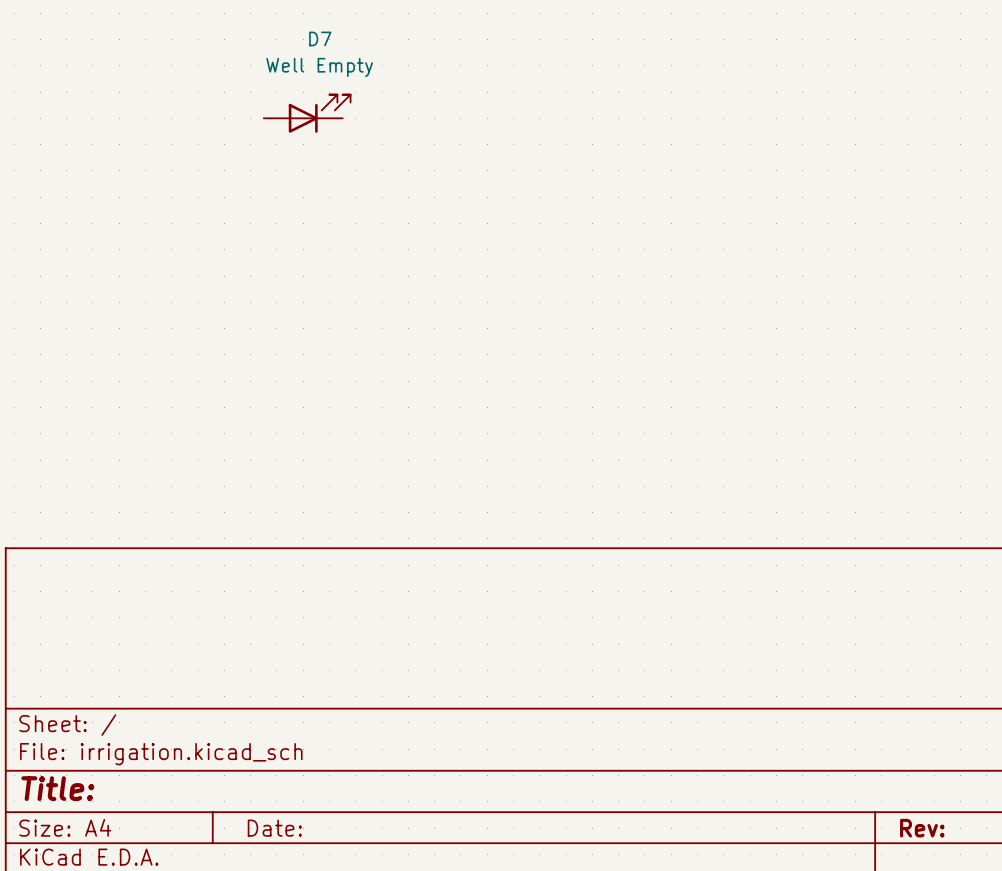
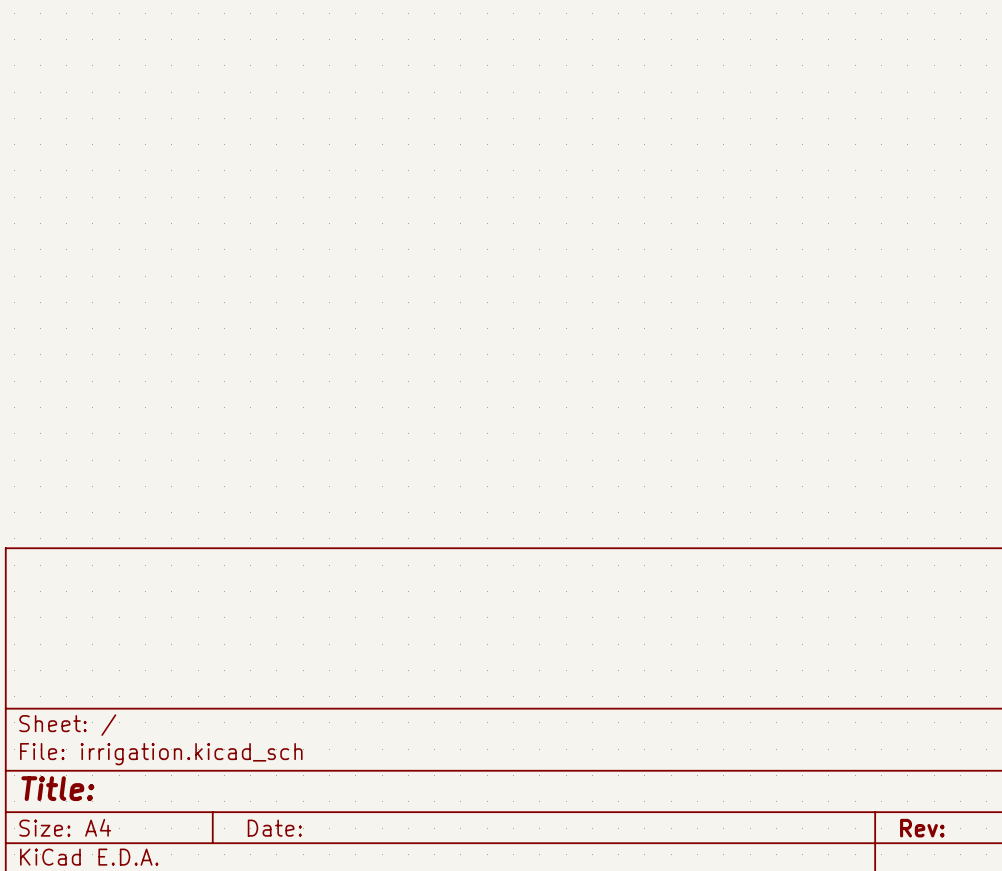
D7: Well Empty (307, 113) -> none

